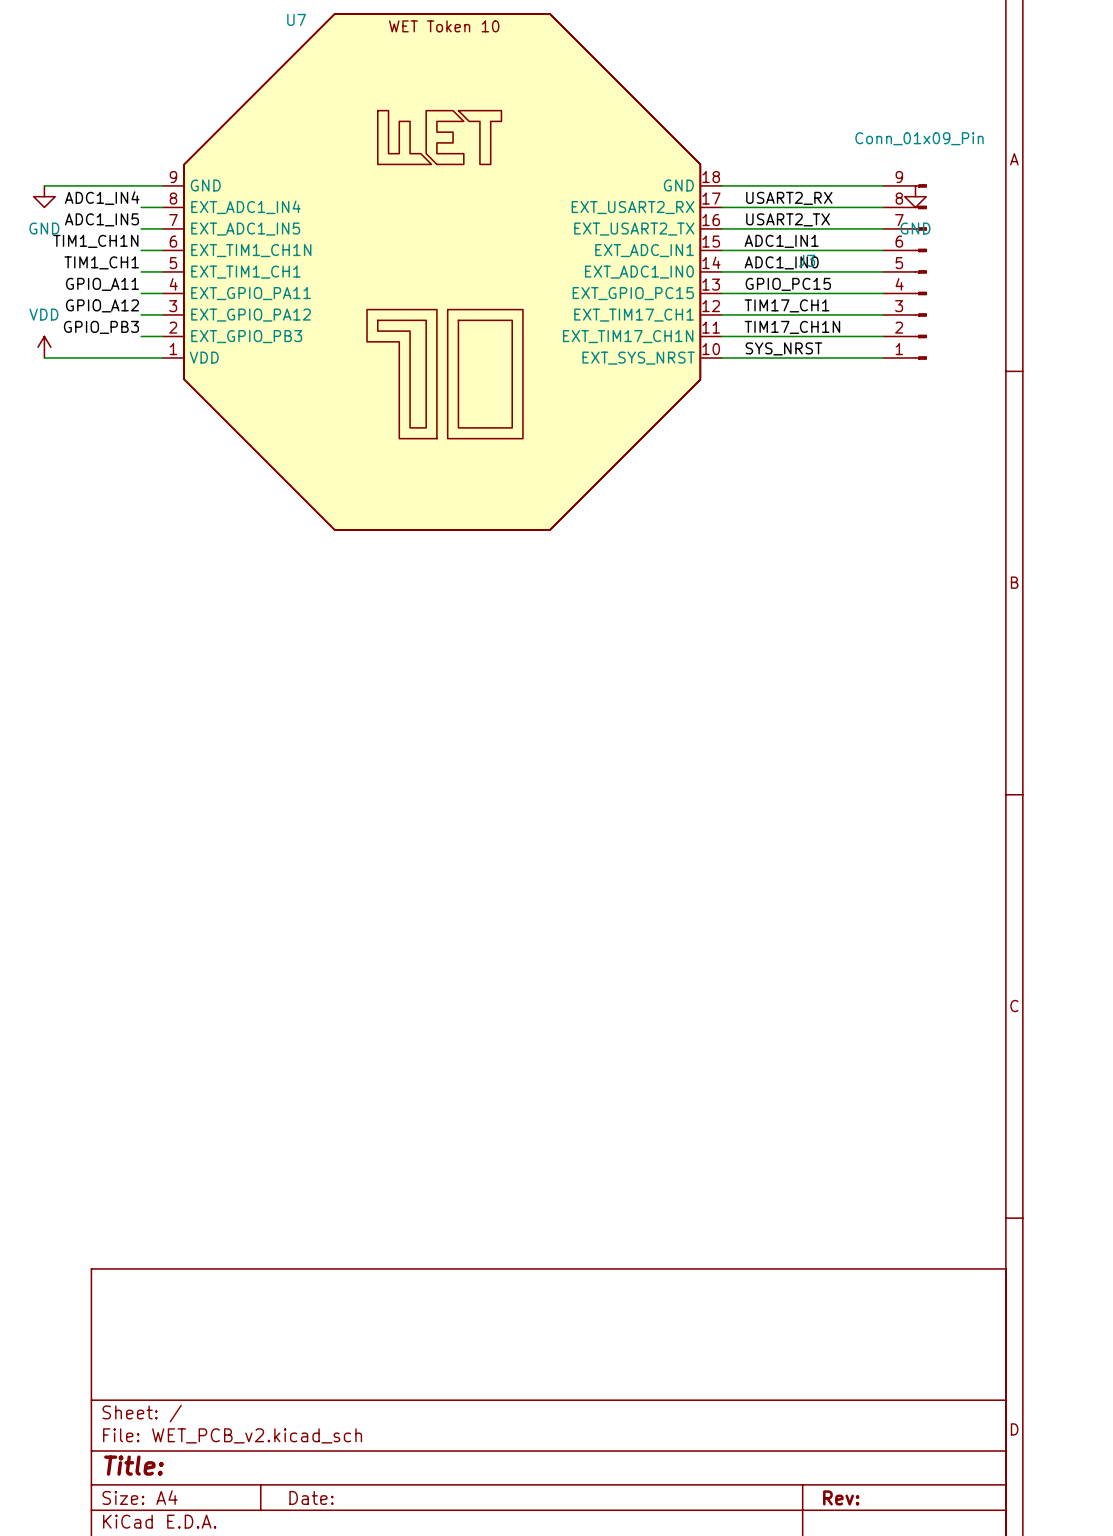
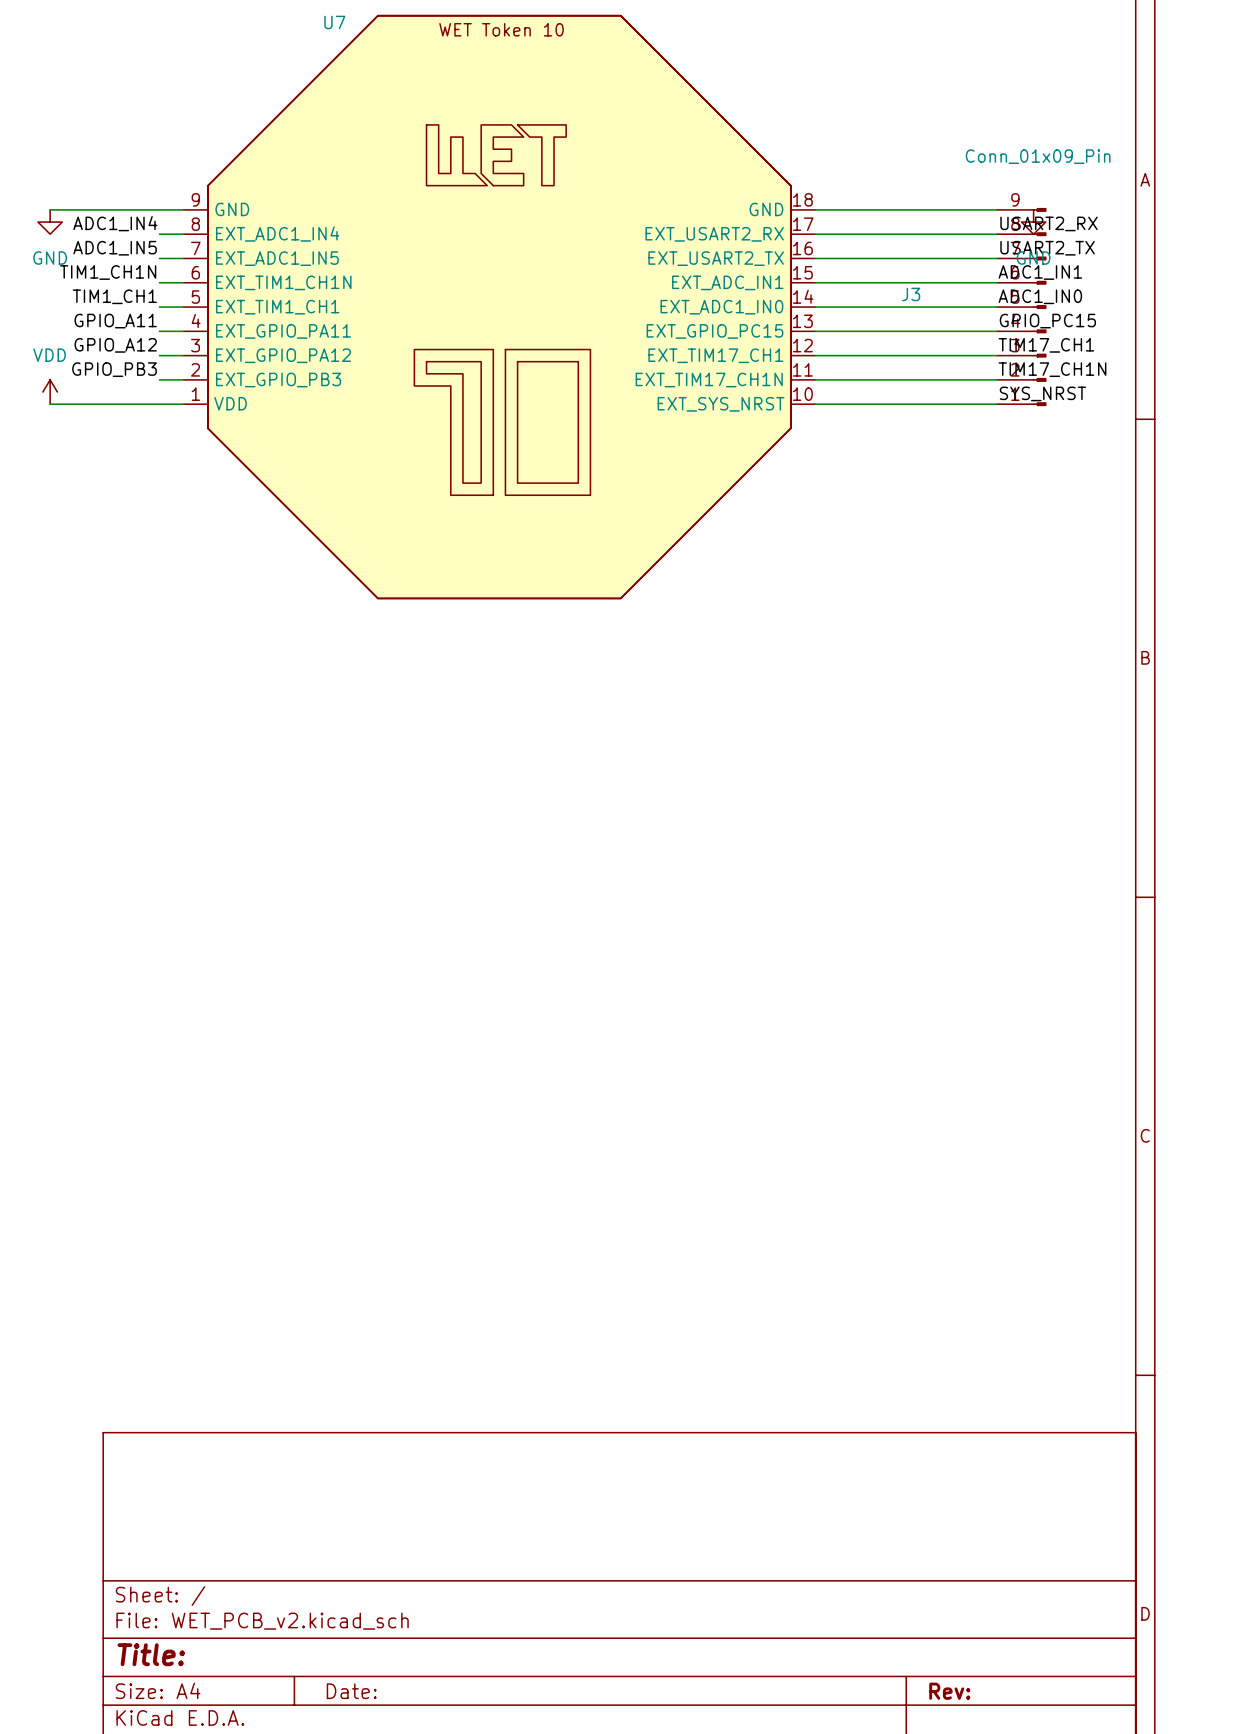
label position: USART2_RX (789, 198) -> USART2_RX (1049, 223)
label position: USART2_TX (788, 219) -> USART2_TX (1047, 248)
label position: ADC1_IN1 (781, 241) -> ADC1_IN1 (1040, 272)
label position: ADC1_IN0 (781, 262) -> ADC1_IN0 (1040, 296)
label position: GPIO_PC15 (788, 284) -> GPIO_PC15 (1047, 321)
label position: TIM17_CH1 (787, 305) -> TIM17_CH1 (1046, 345)
label position: TIM17_CH1N (792, 327) -> TIM17_CH1N (1052, 369)
label position: SYS_NRST (783, 348) -> SYS_NRST (1042, 393)

